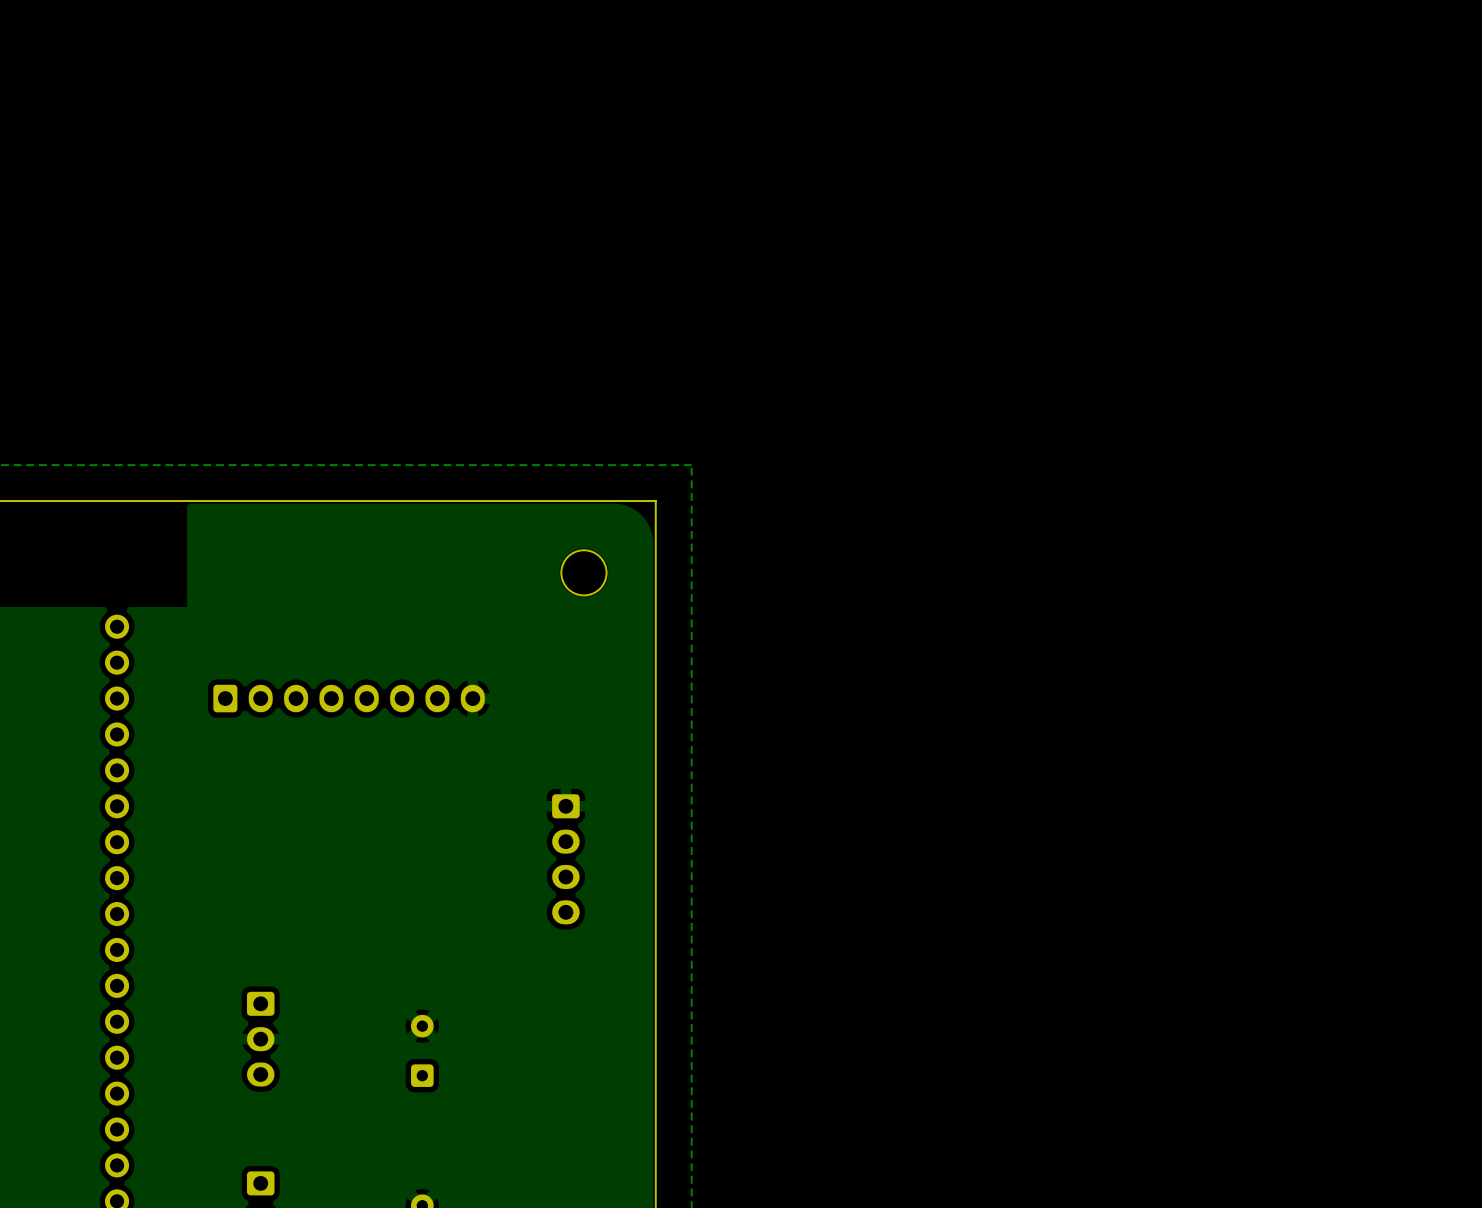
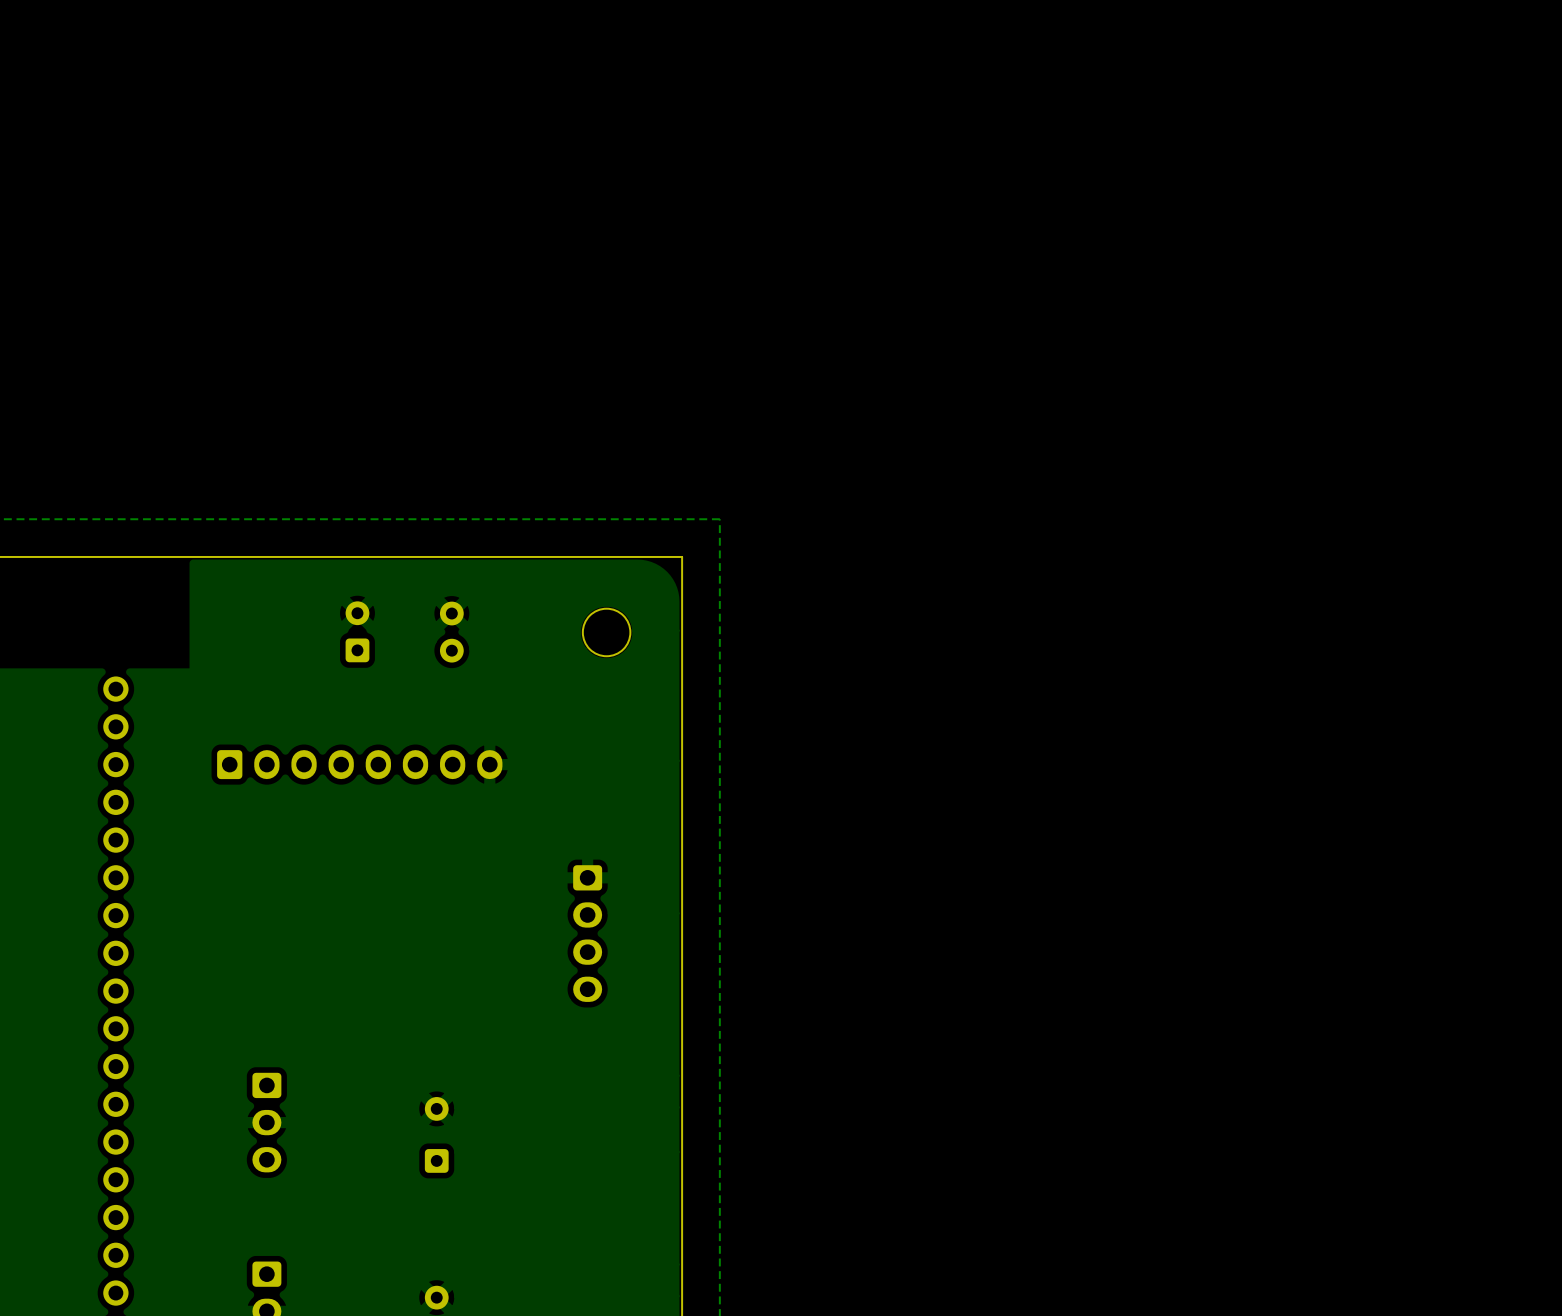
part: none -> (357, 631)
part: none -> (451, 632)

